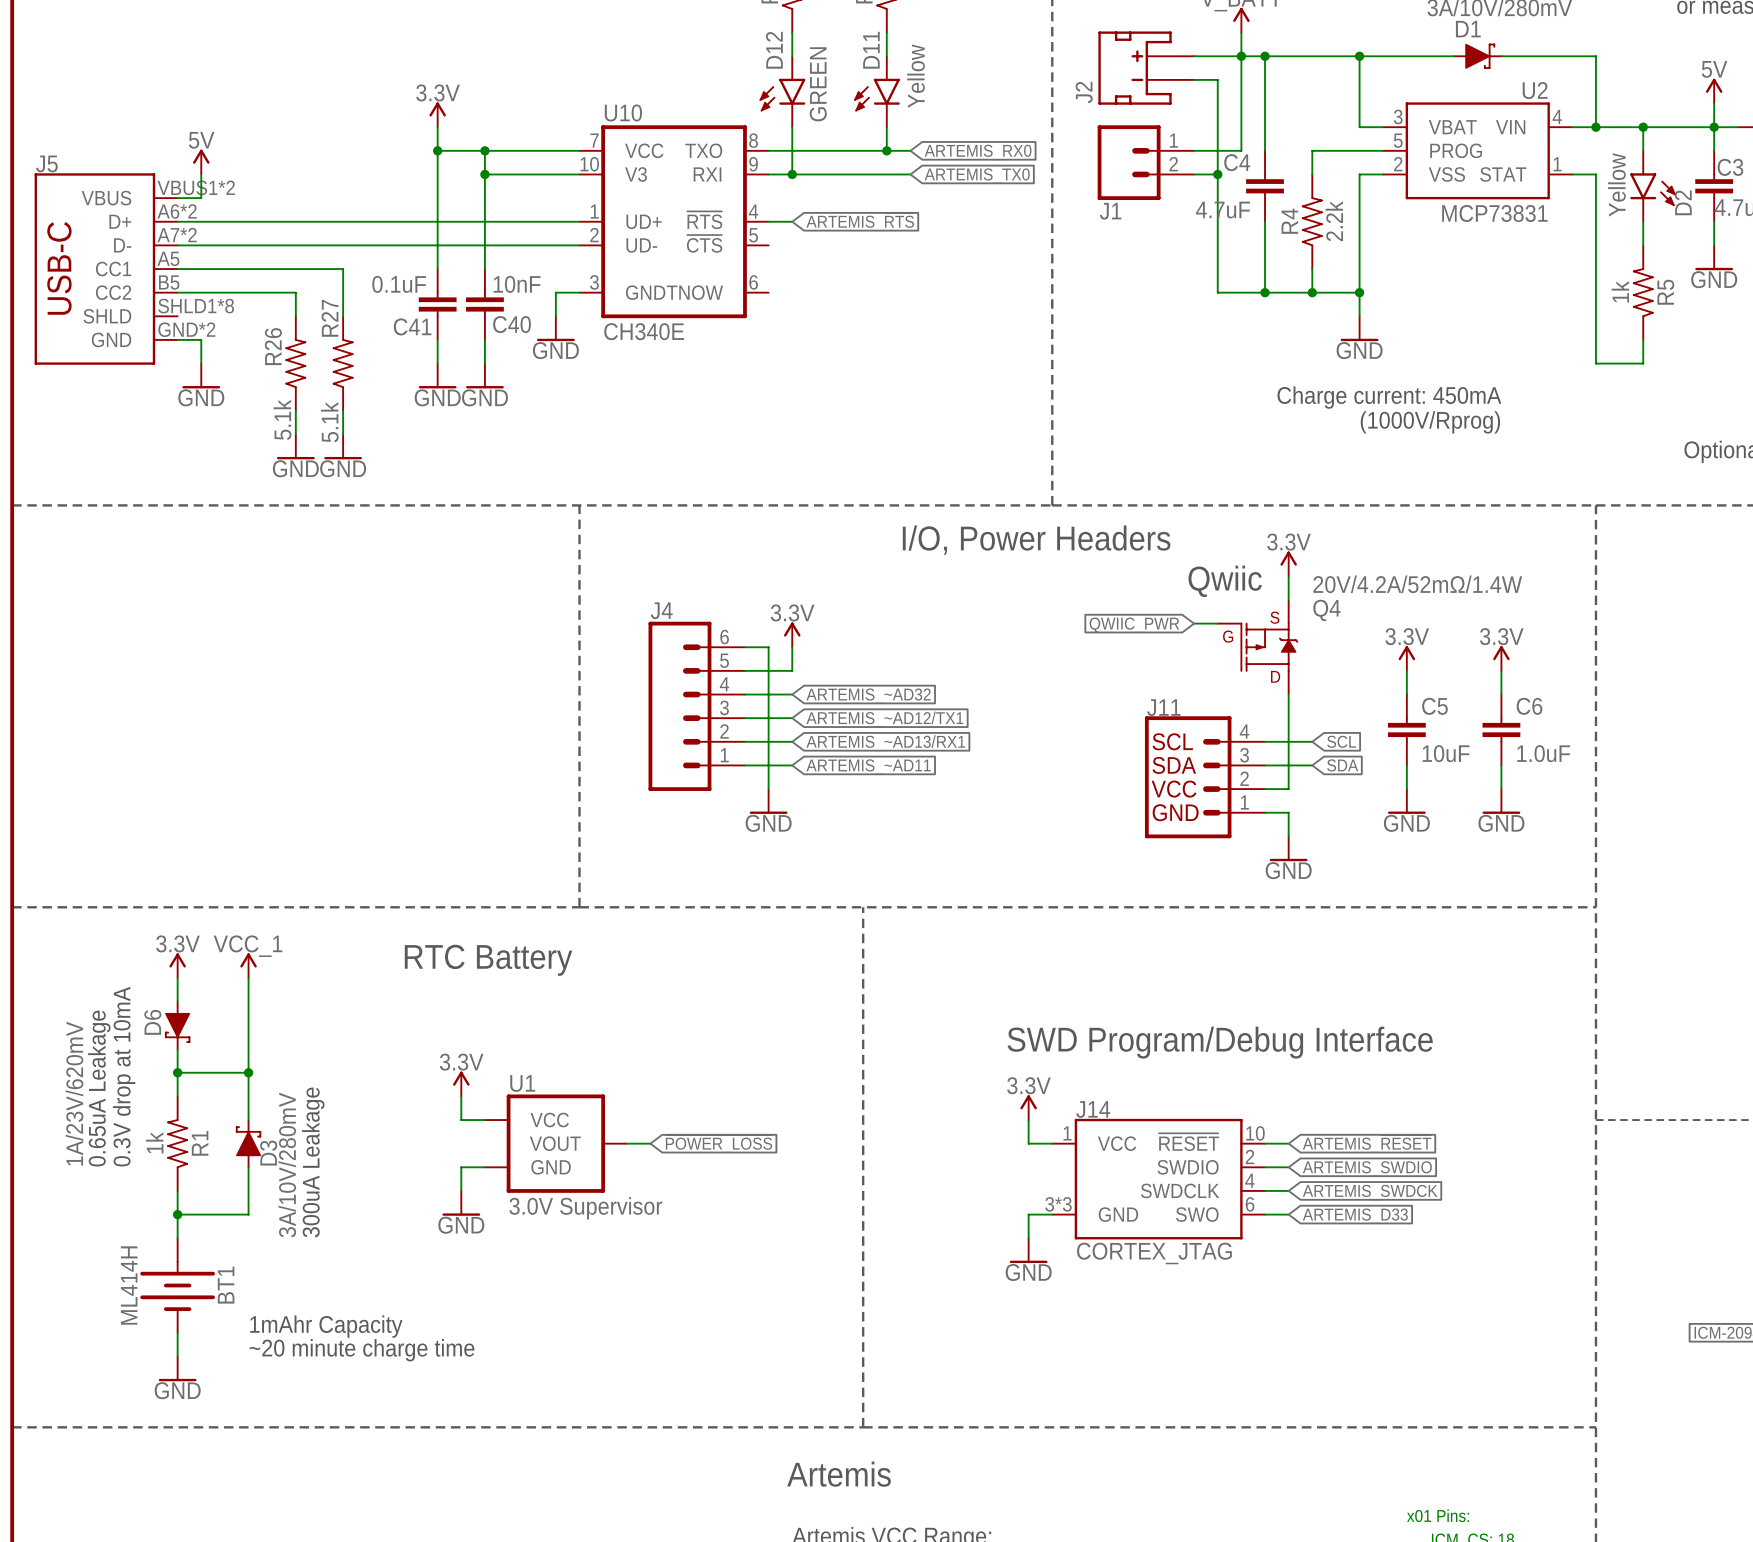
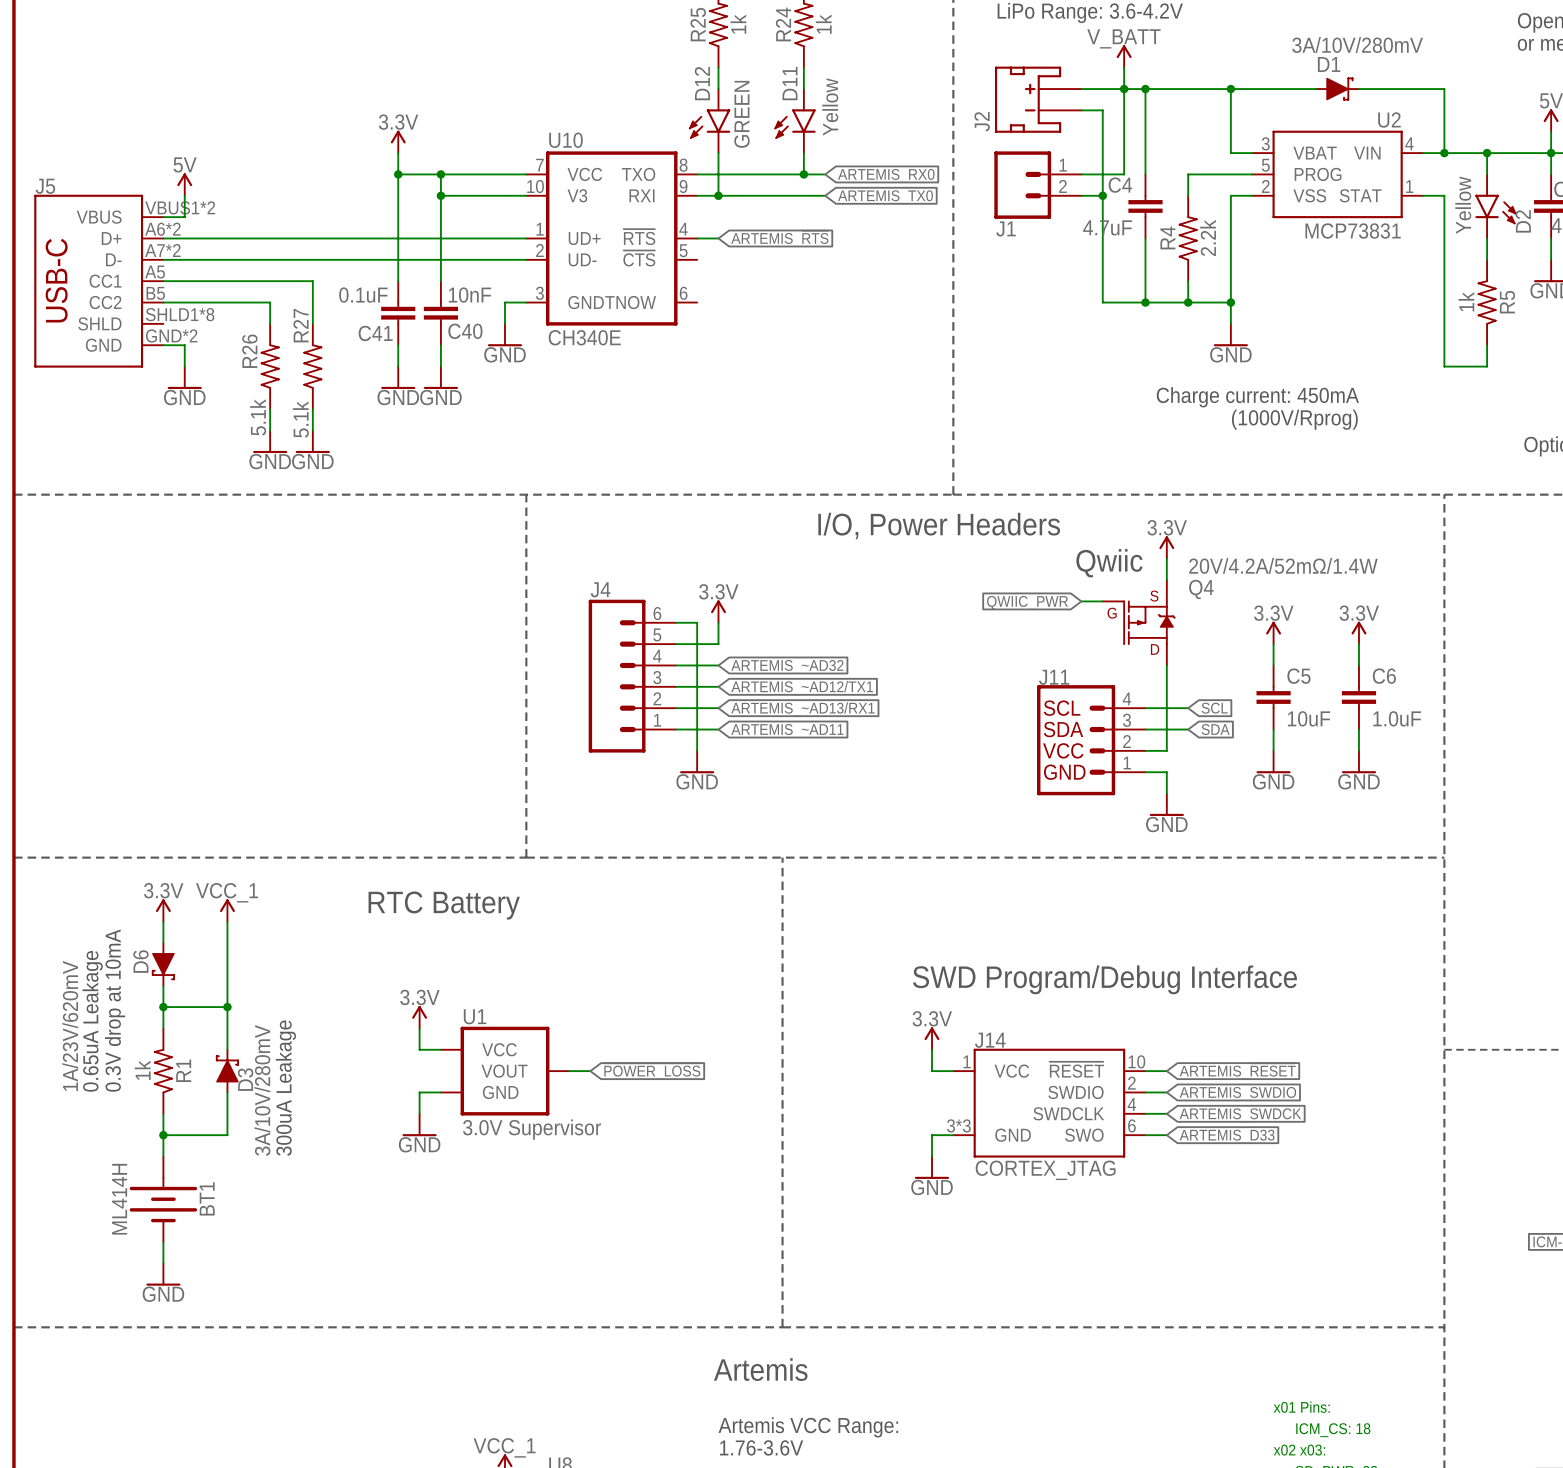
text: 1mAhr Capacity (326, 1326) -> none
text: ~20 minute charge time (361, 1350) -> none

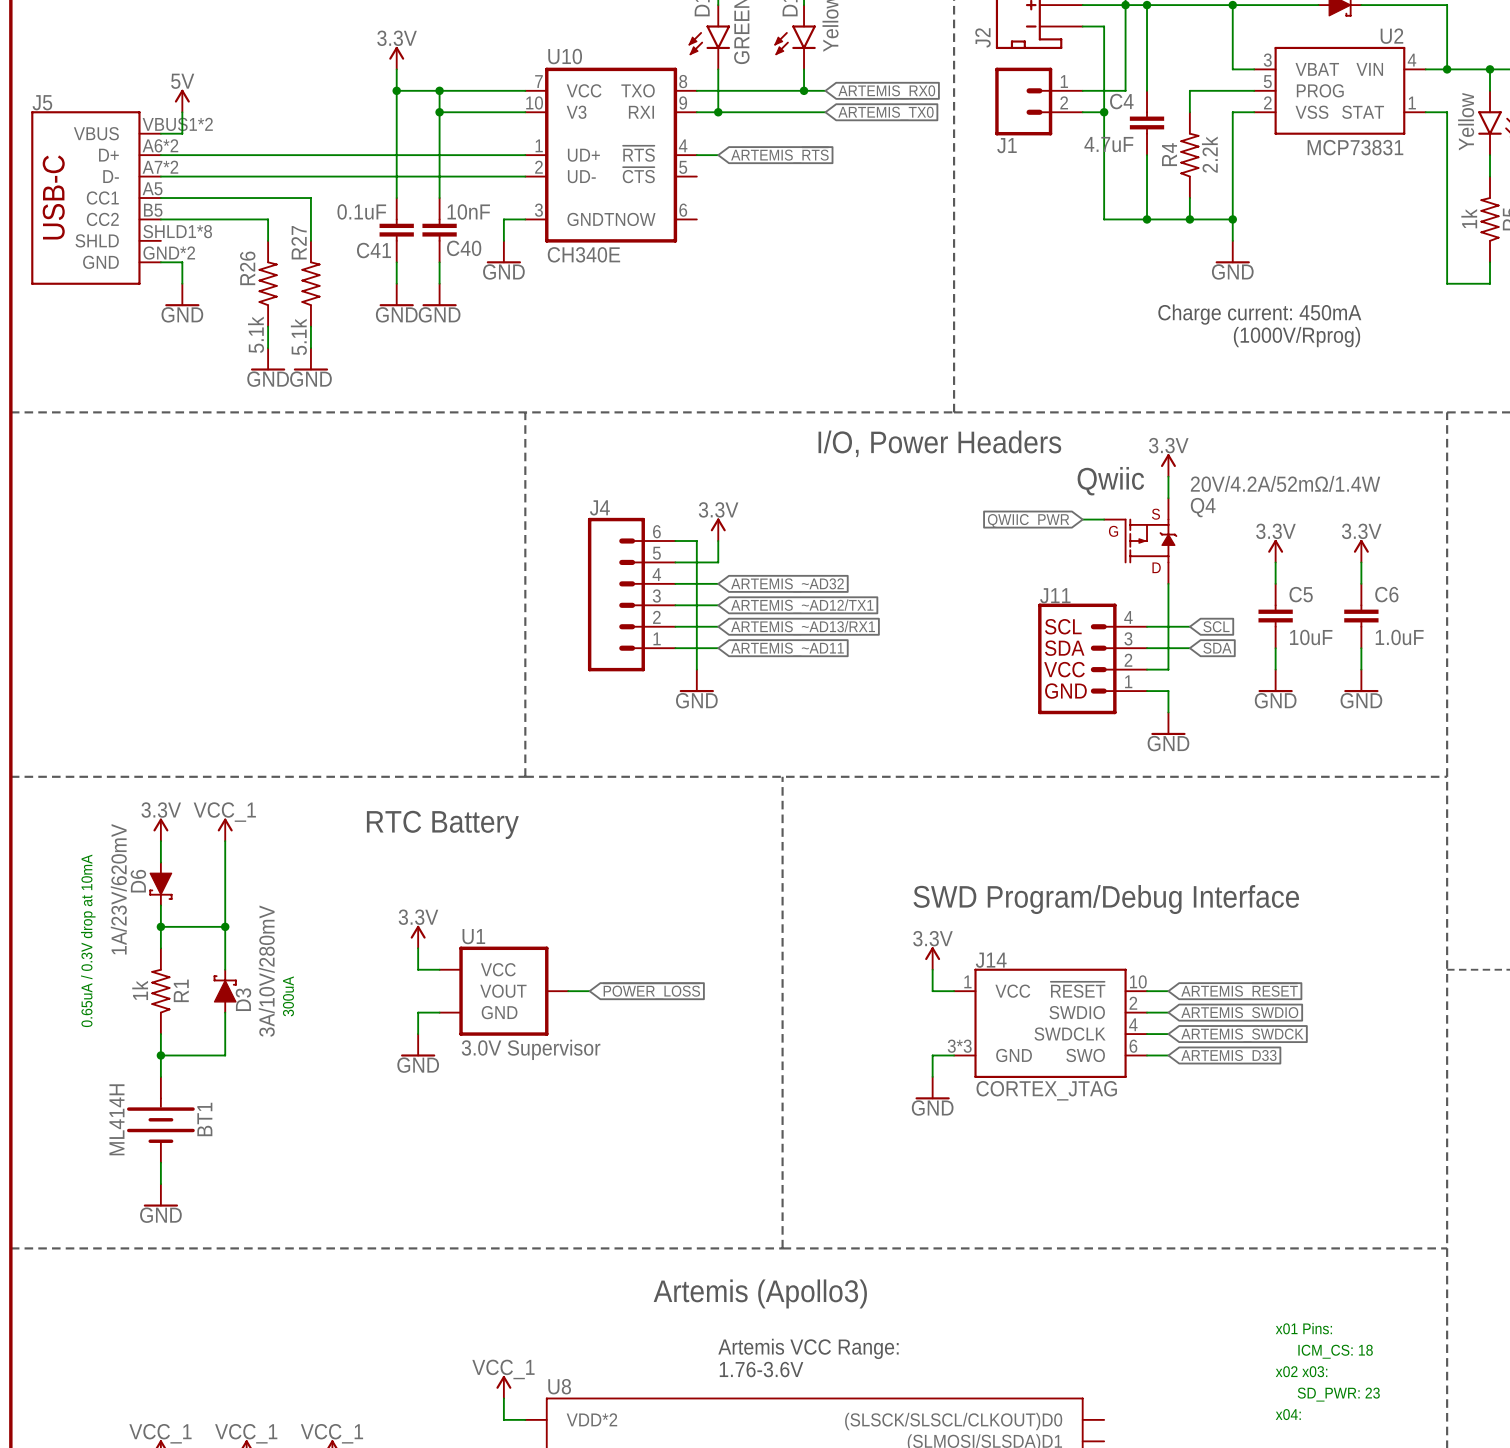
text: 0.3V drop at 10mA (115, 1010) -> 0.65uA / 0.3V drop at 10mA (88, 940)
text: 0.65uA Leakage (92, 1021) -> none
D6 value position: 1A/23V/620mV (70, 1026) -> 1A/23V/620mV (118, 889)
text: none -> 300uA (288, 996)
text: 300uA Leakage (285, 1088) -> none
D3 value position: 3A/10V/280mV (262, 1090) -> 3A/10V/280mV (266, 971)
text: Artemis (760, 1369) -> Artemis (Apollo3) (760, 1293)

